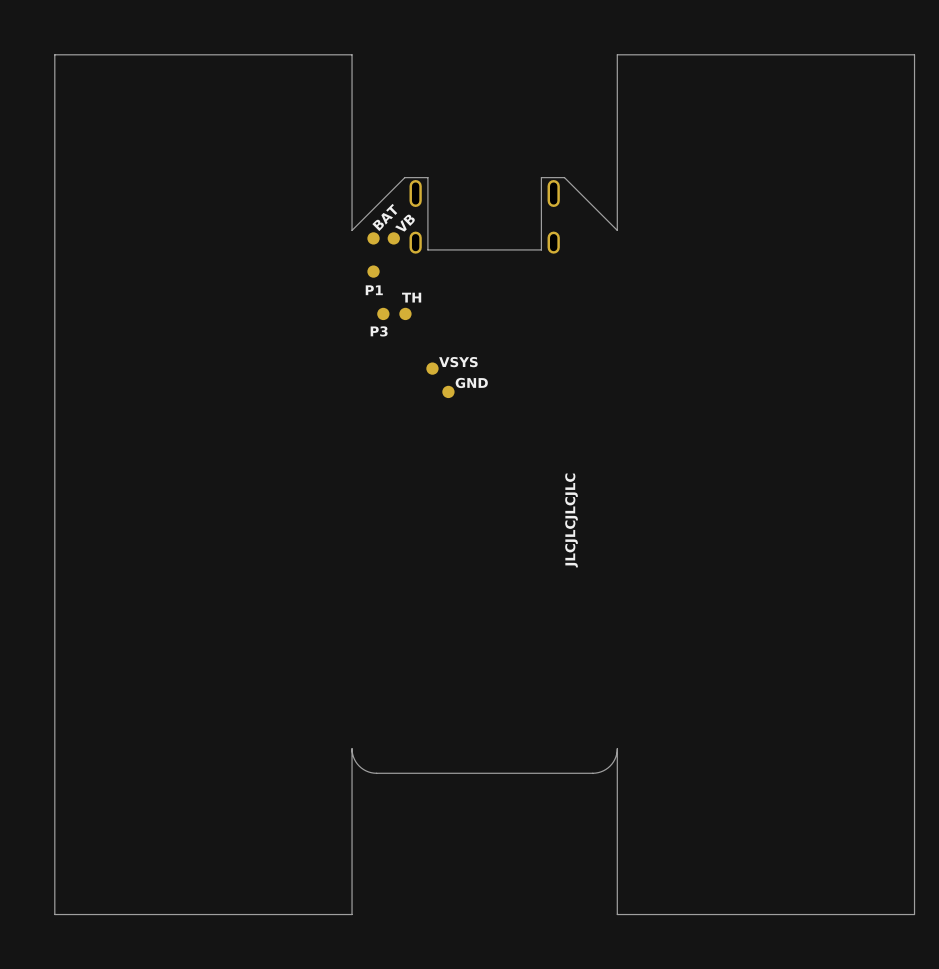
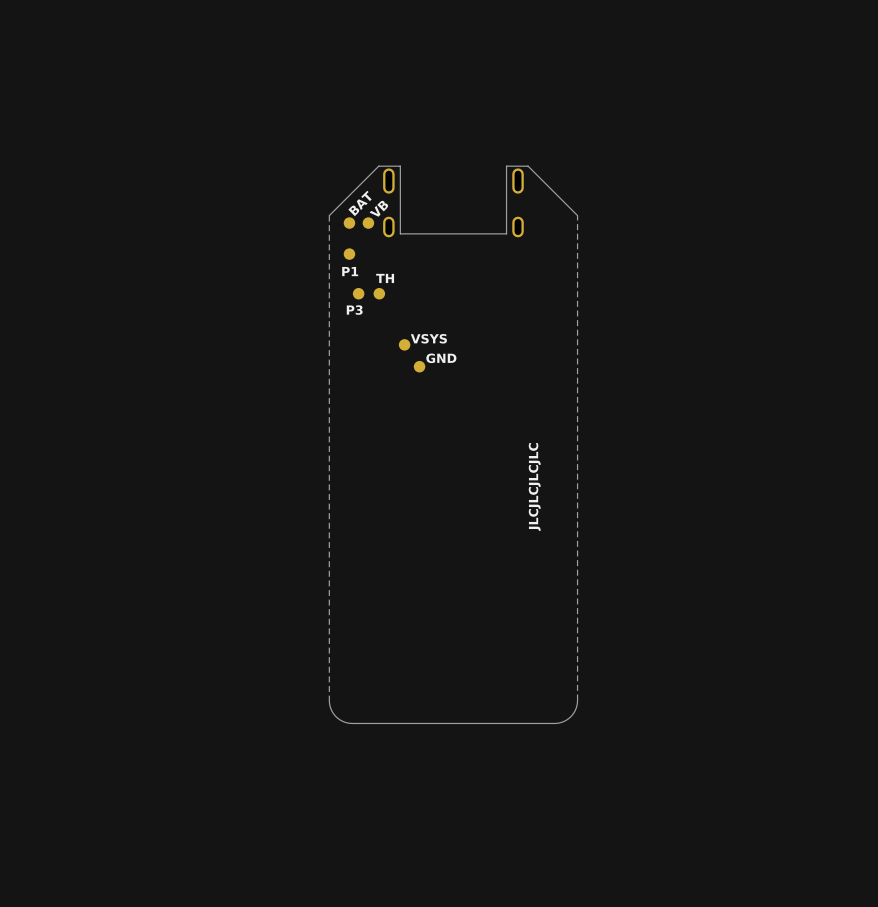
board edge: (352, 230) (352, 54) (54, 54) (54, 914) (352, 914) (352, 748) -> (329, 215) (329, 700)
board edge: (617, 230) (617, 54) (914, 54) (914, 914) (617, 914) (617, 748) -> (577, 215) (577, 700)

